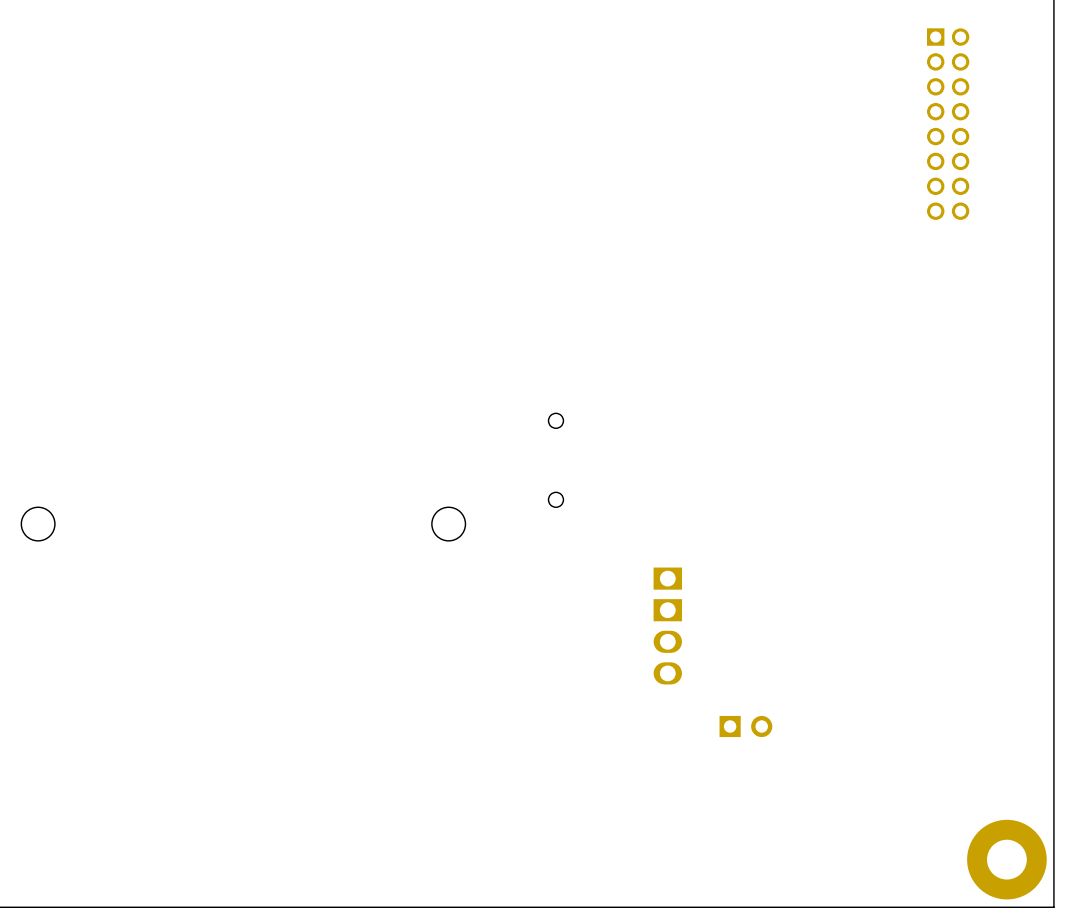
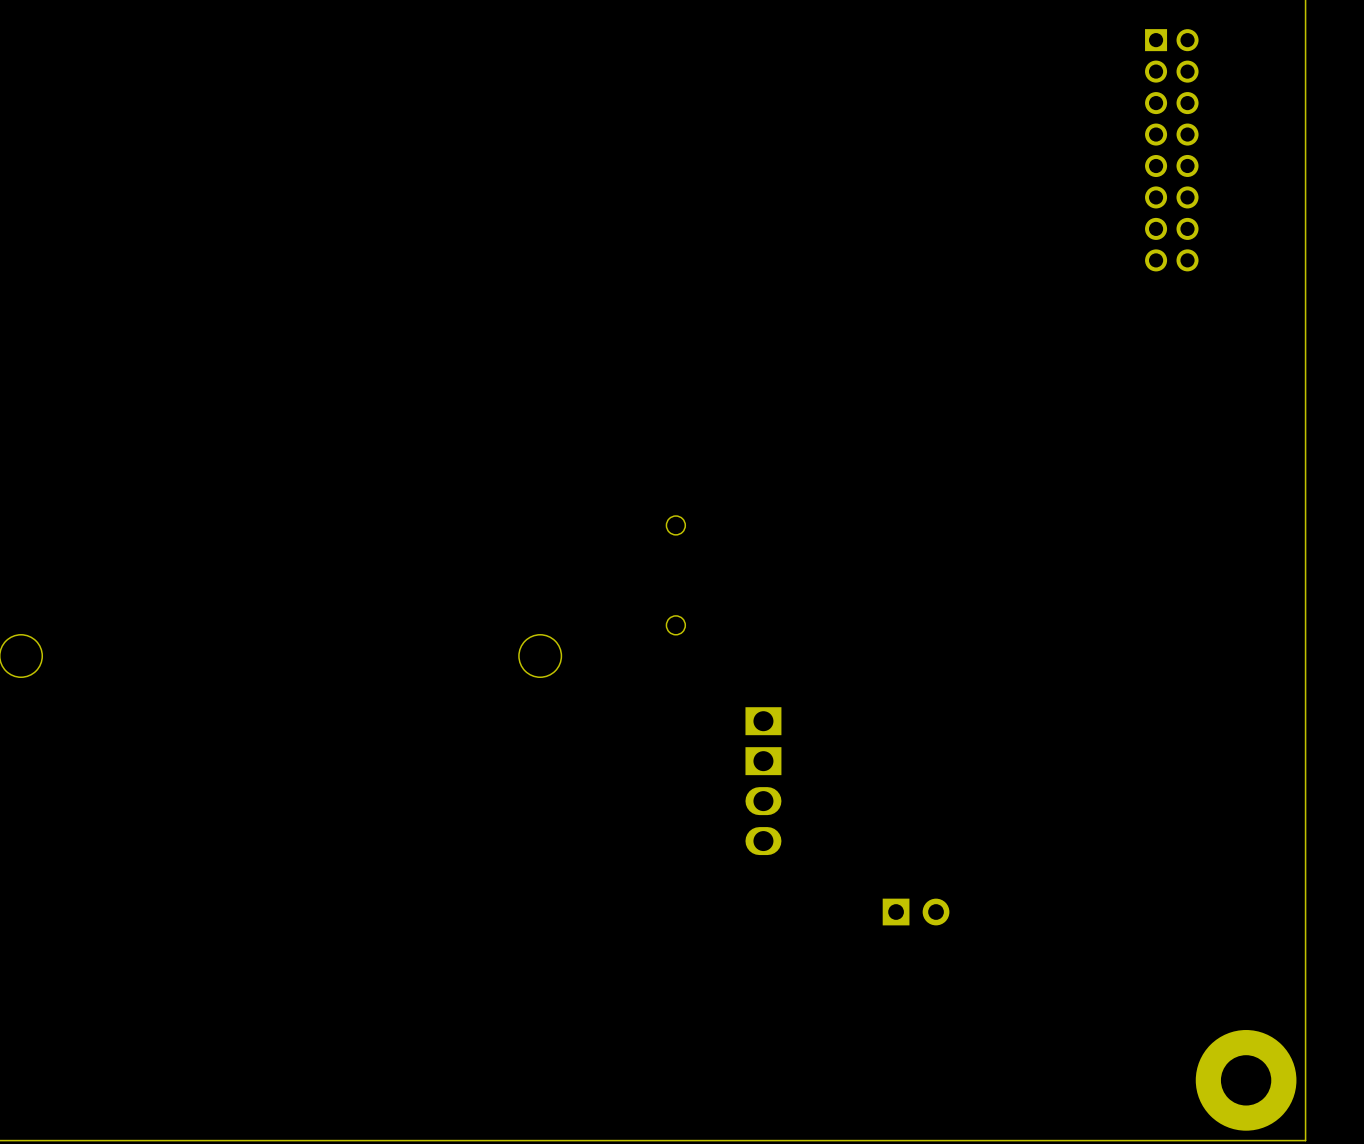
part position: (667, 626) -> (763, 781)

